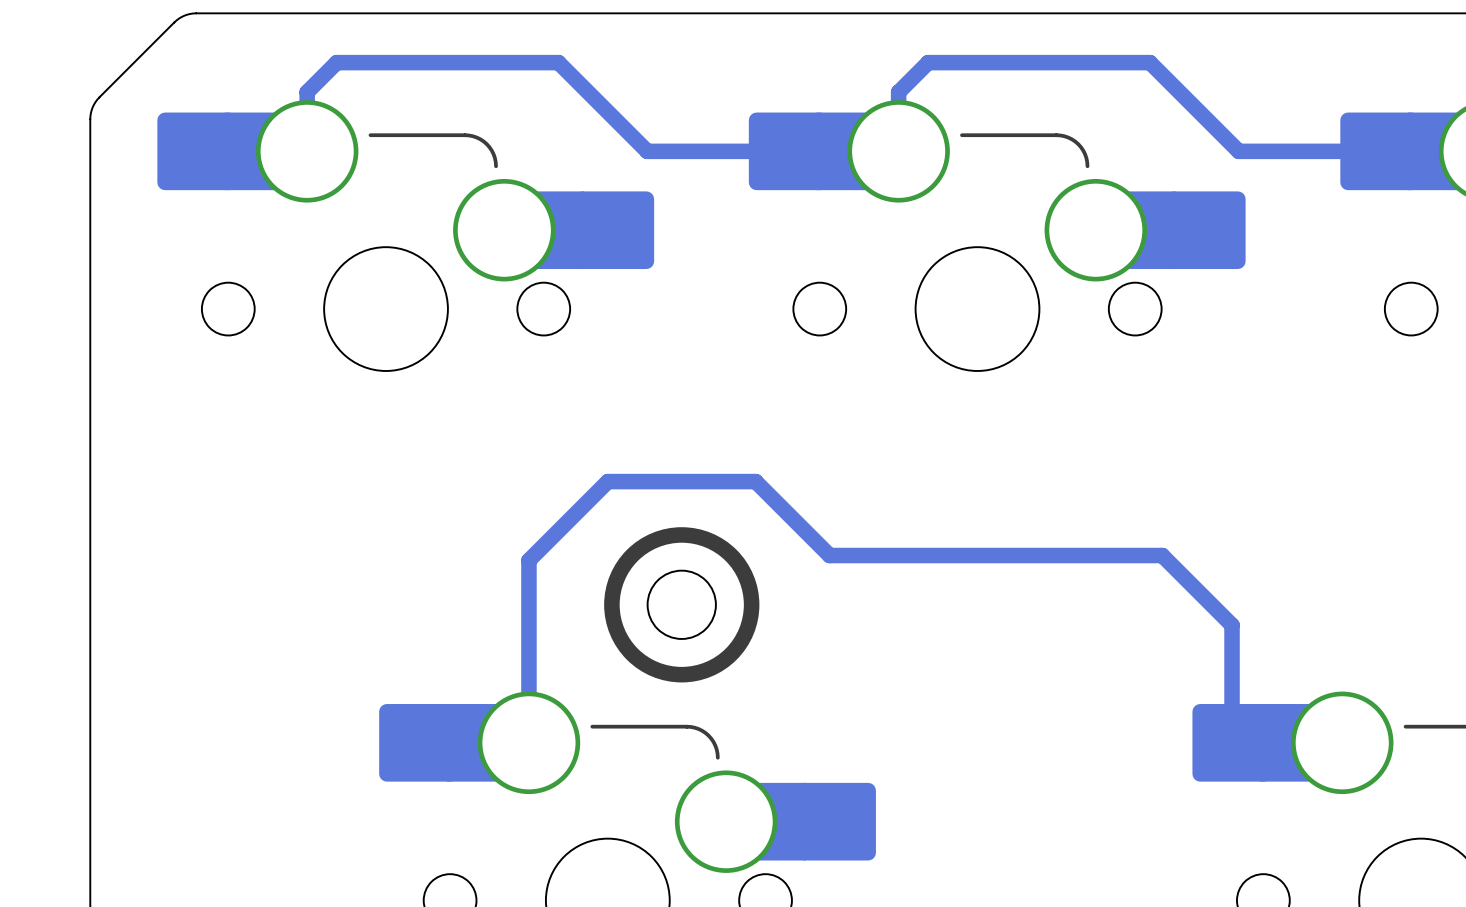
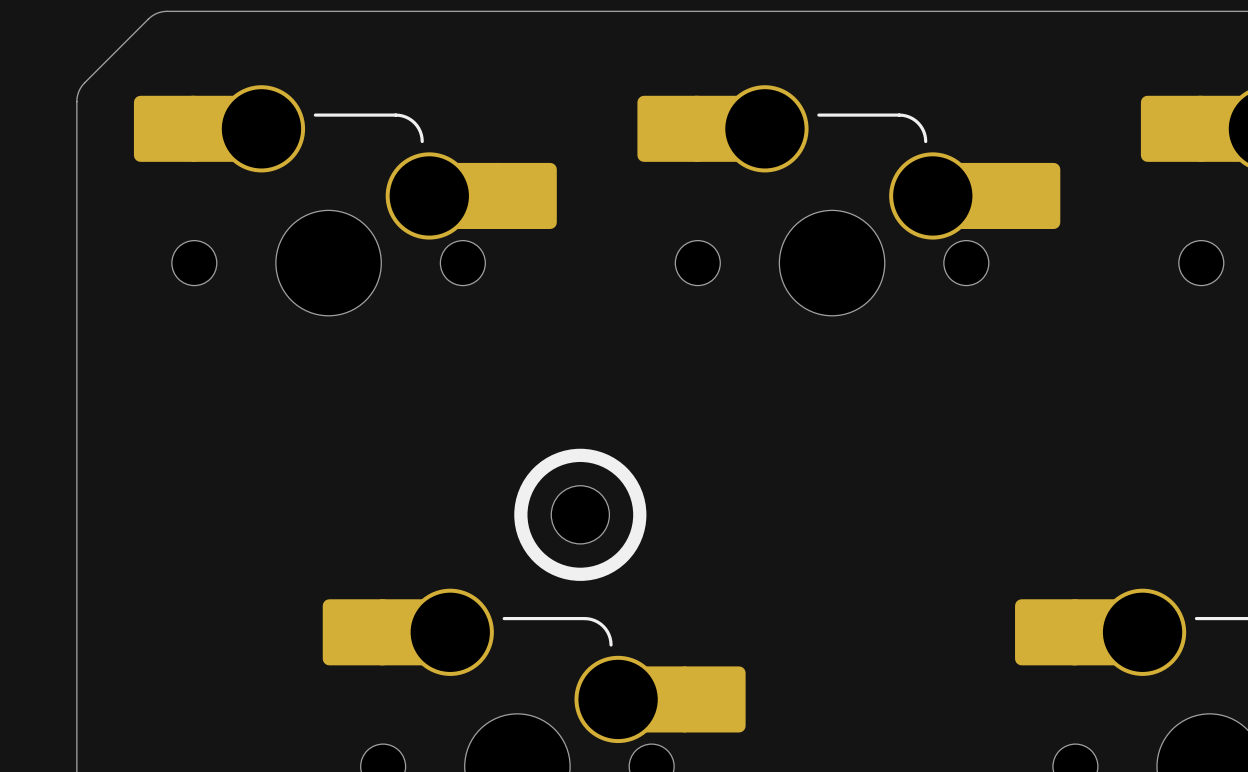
track: (788, 151) (647, 151) (558, 62) (336, 62) (307, 92) (307, 151) -> none
track: (1379, 151) (1238, 151) (1150, 62) (928, 62) (898, 92) (898, 151) -> none
track: (1232, 742) (1232, 625) (1162, 555) (829, 555) (755, 481) (607, 481) (528, 560) (528, 742) -> none

